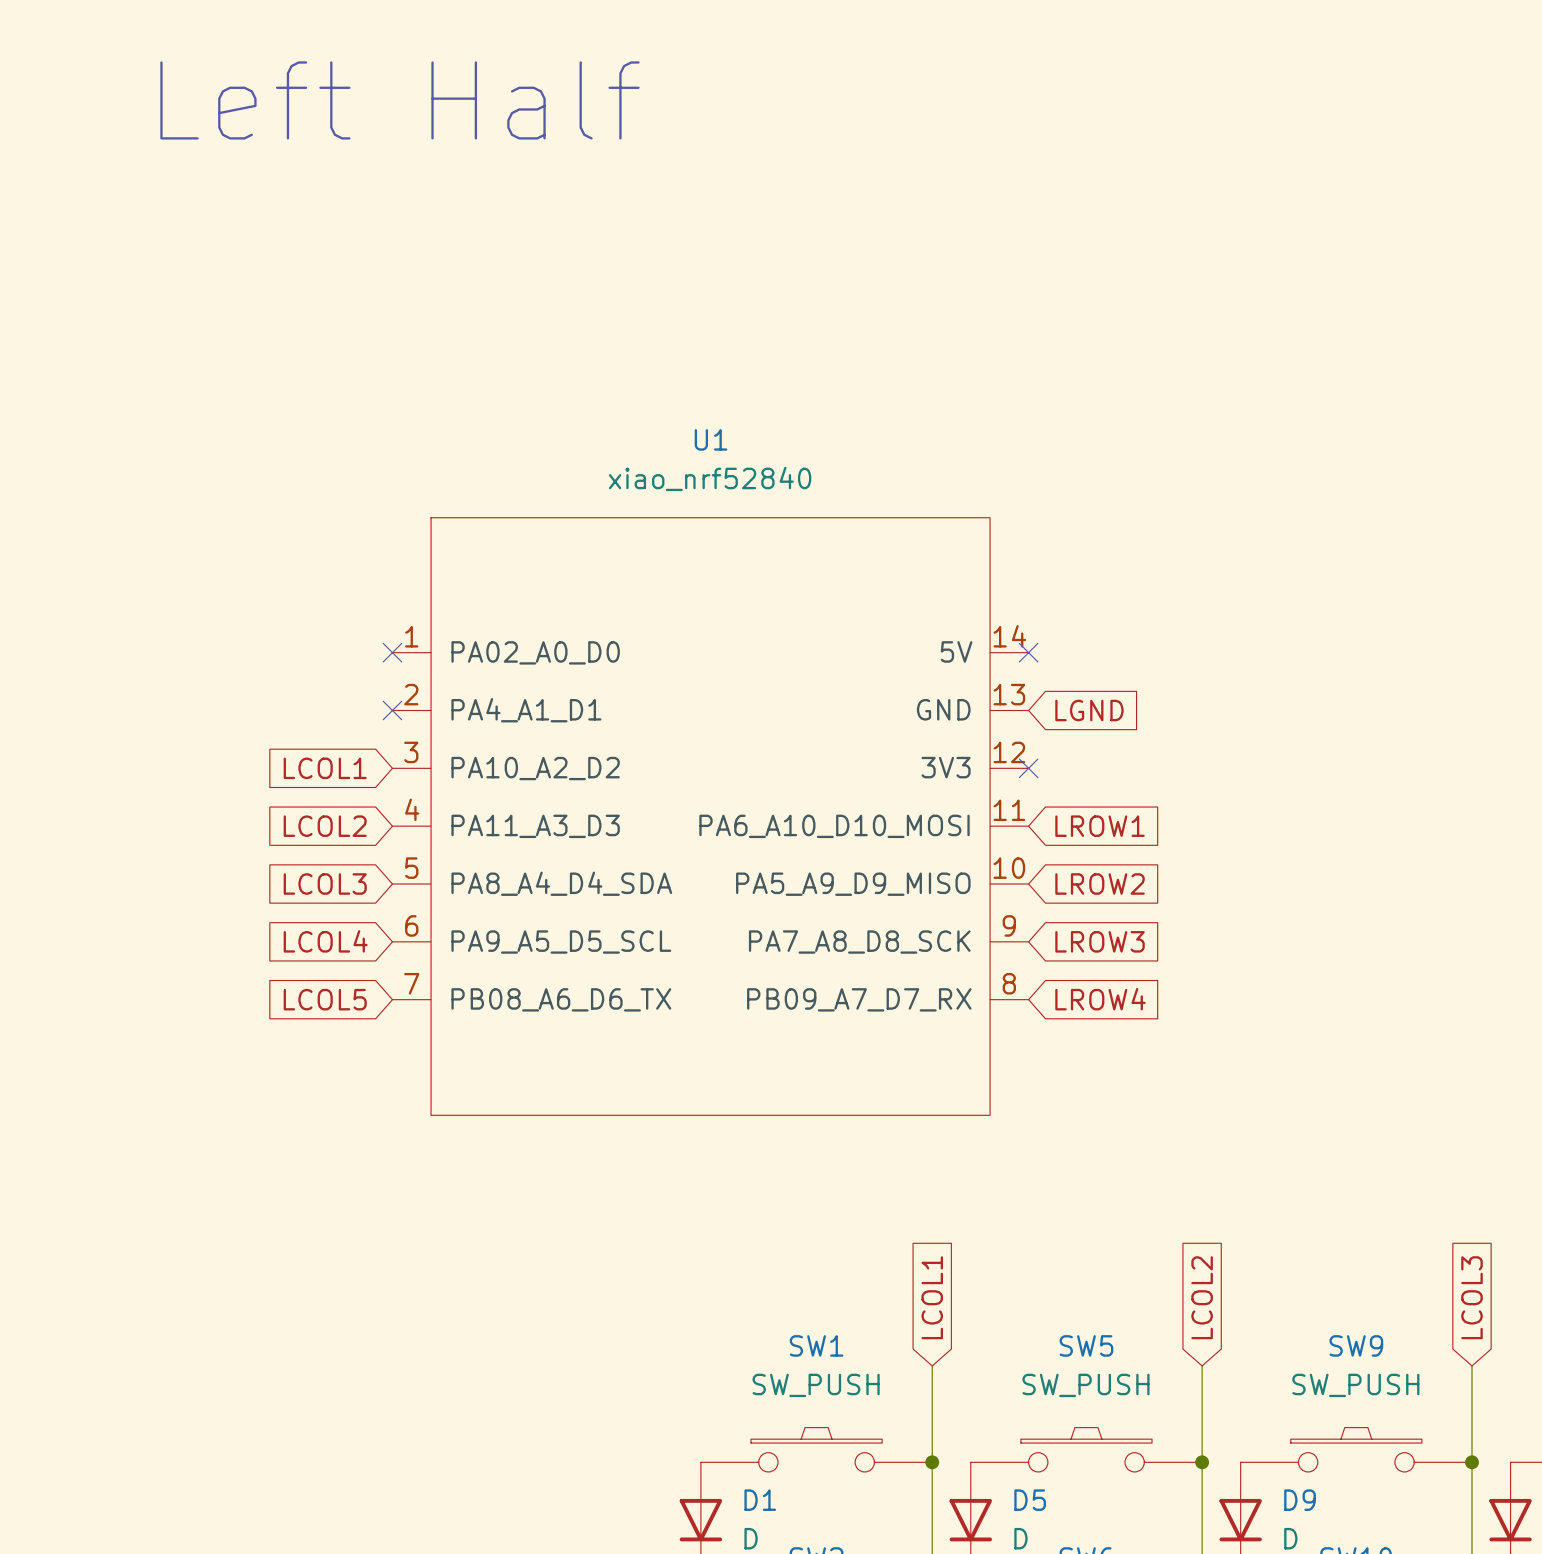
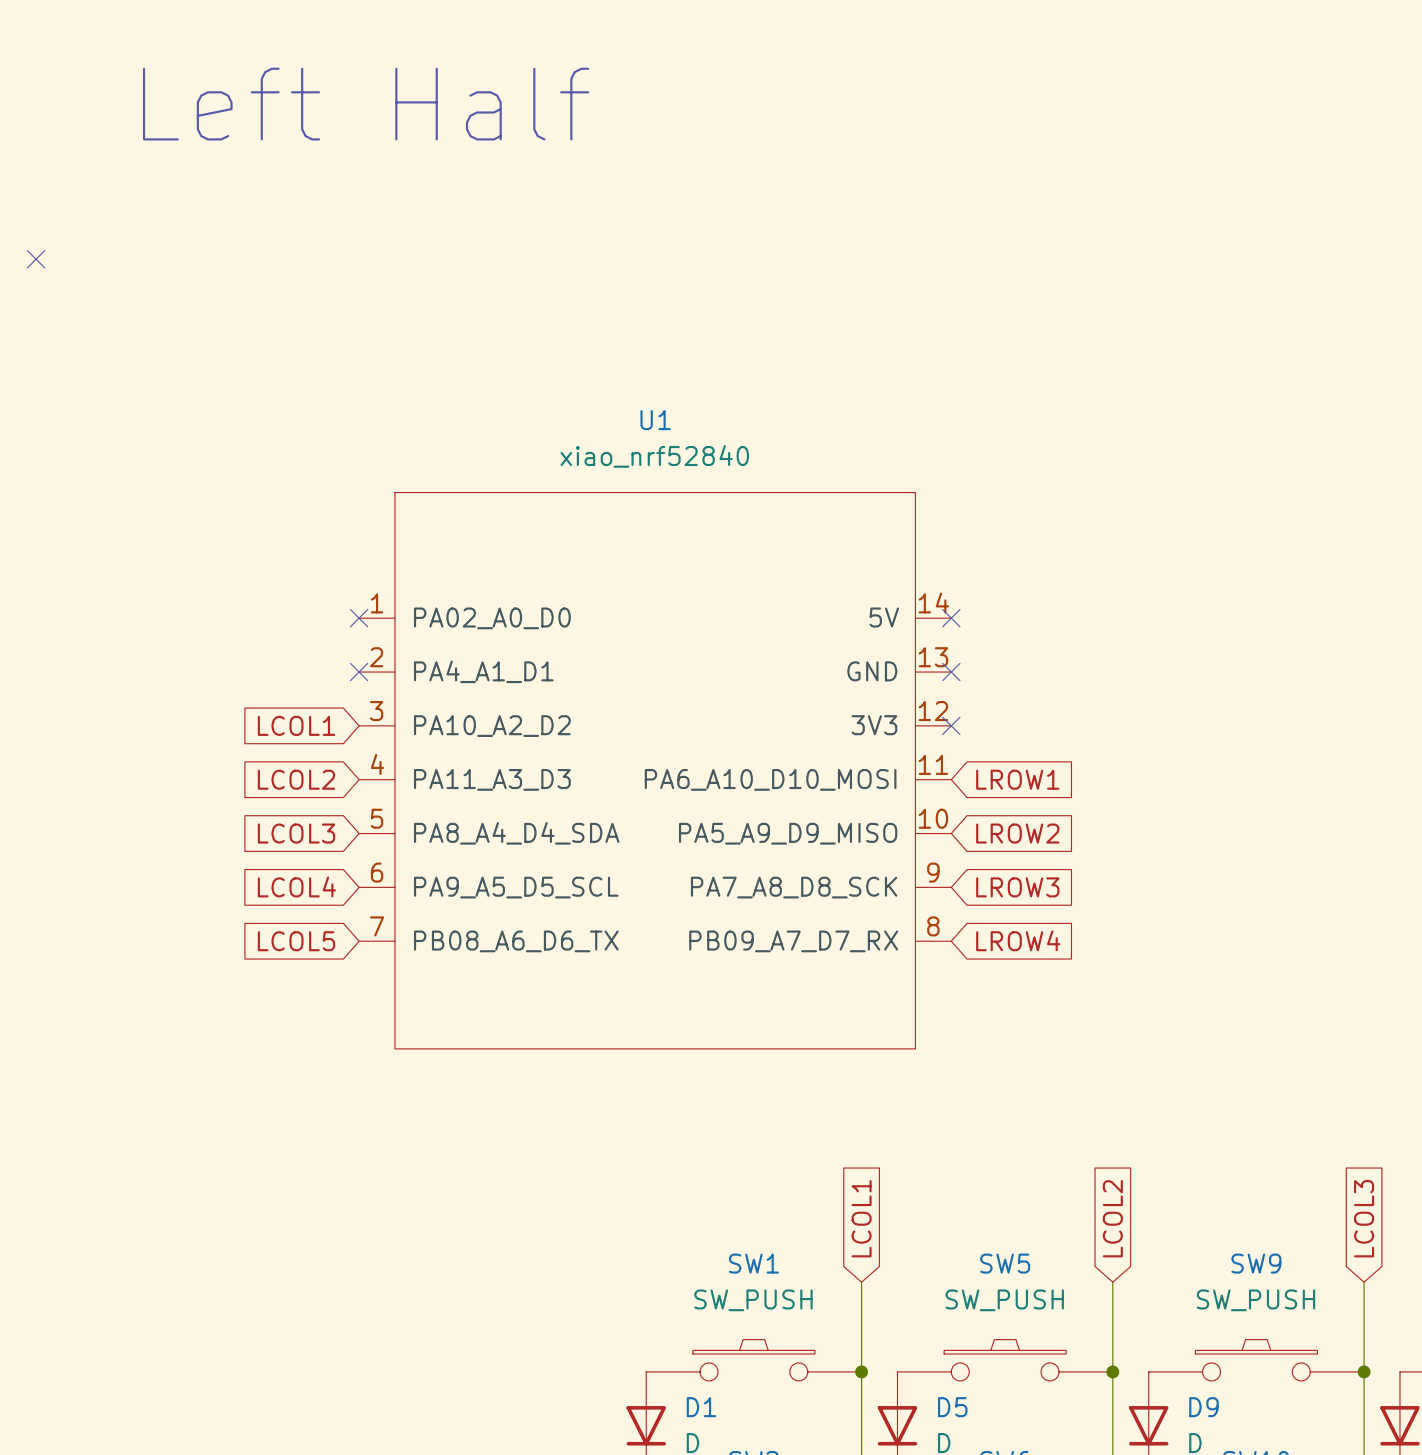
no-connect mark: none -> (36, 259)
no-connect mark: none -> (951, 672)
global label: LGND (1089, 710) -> none

